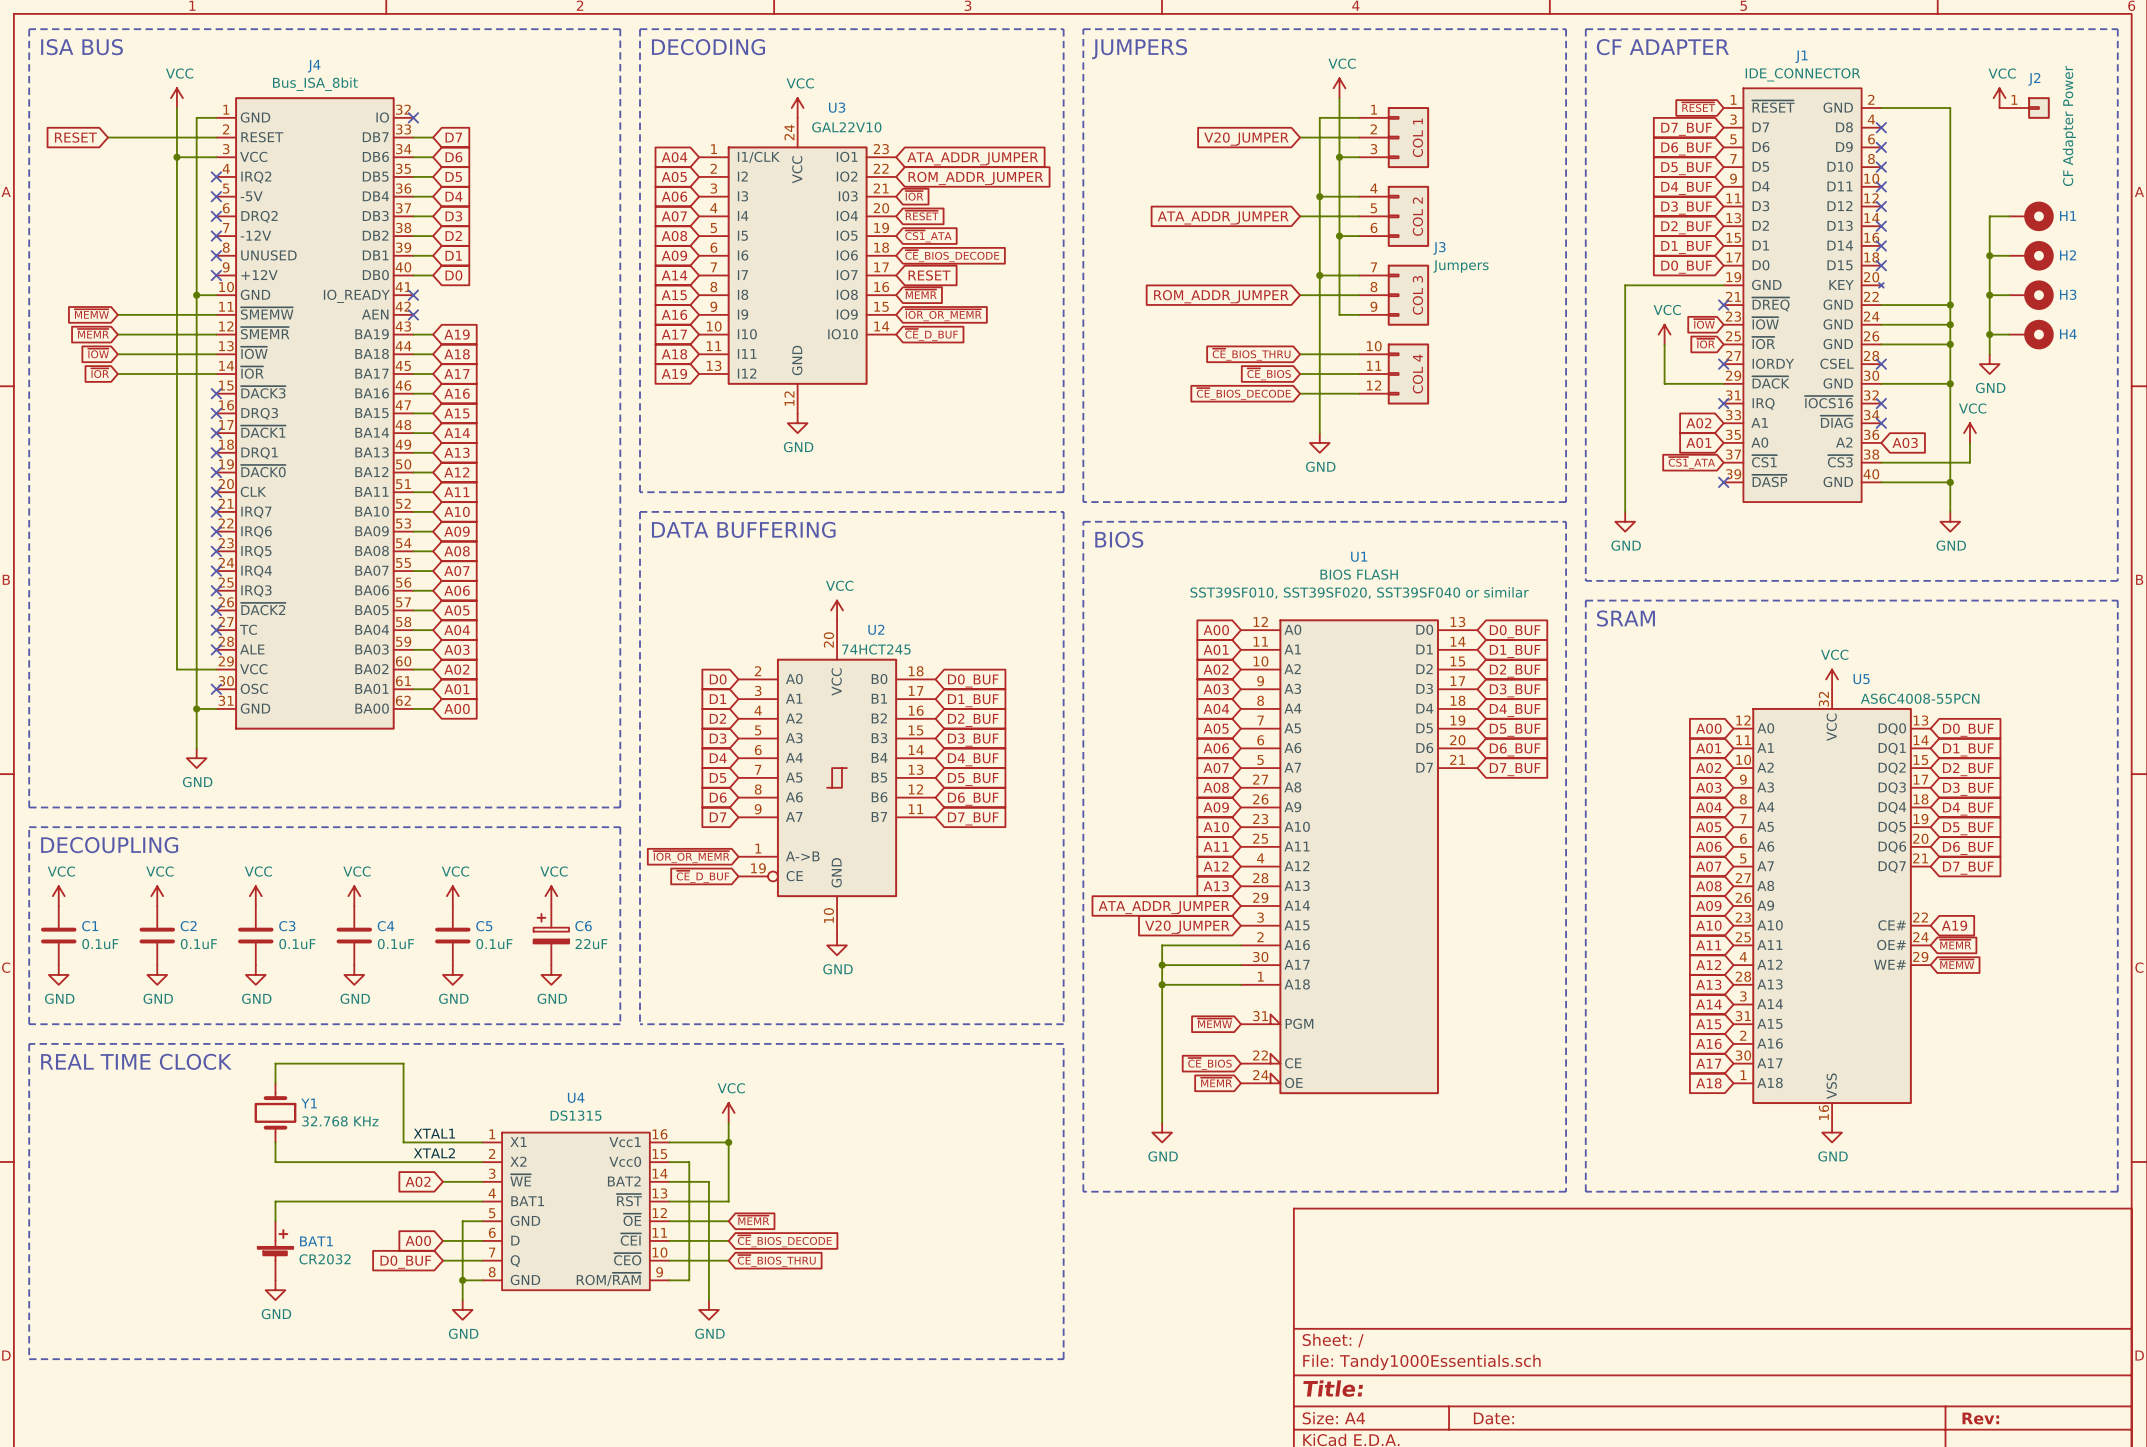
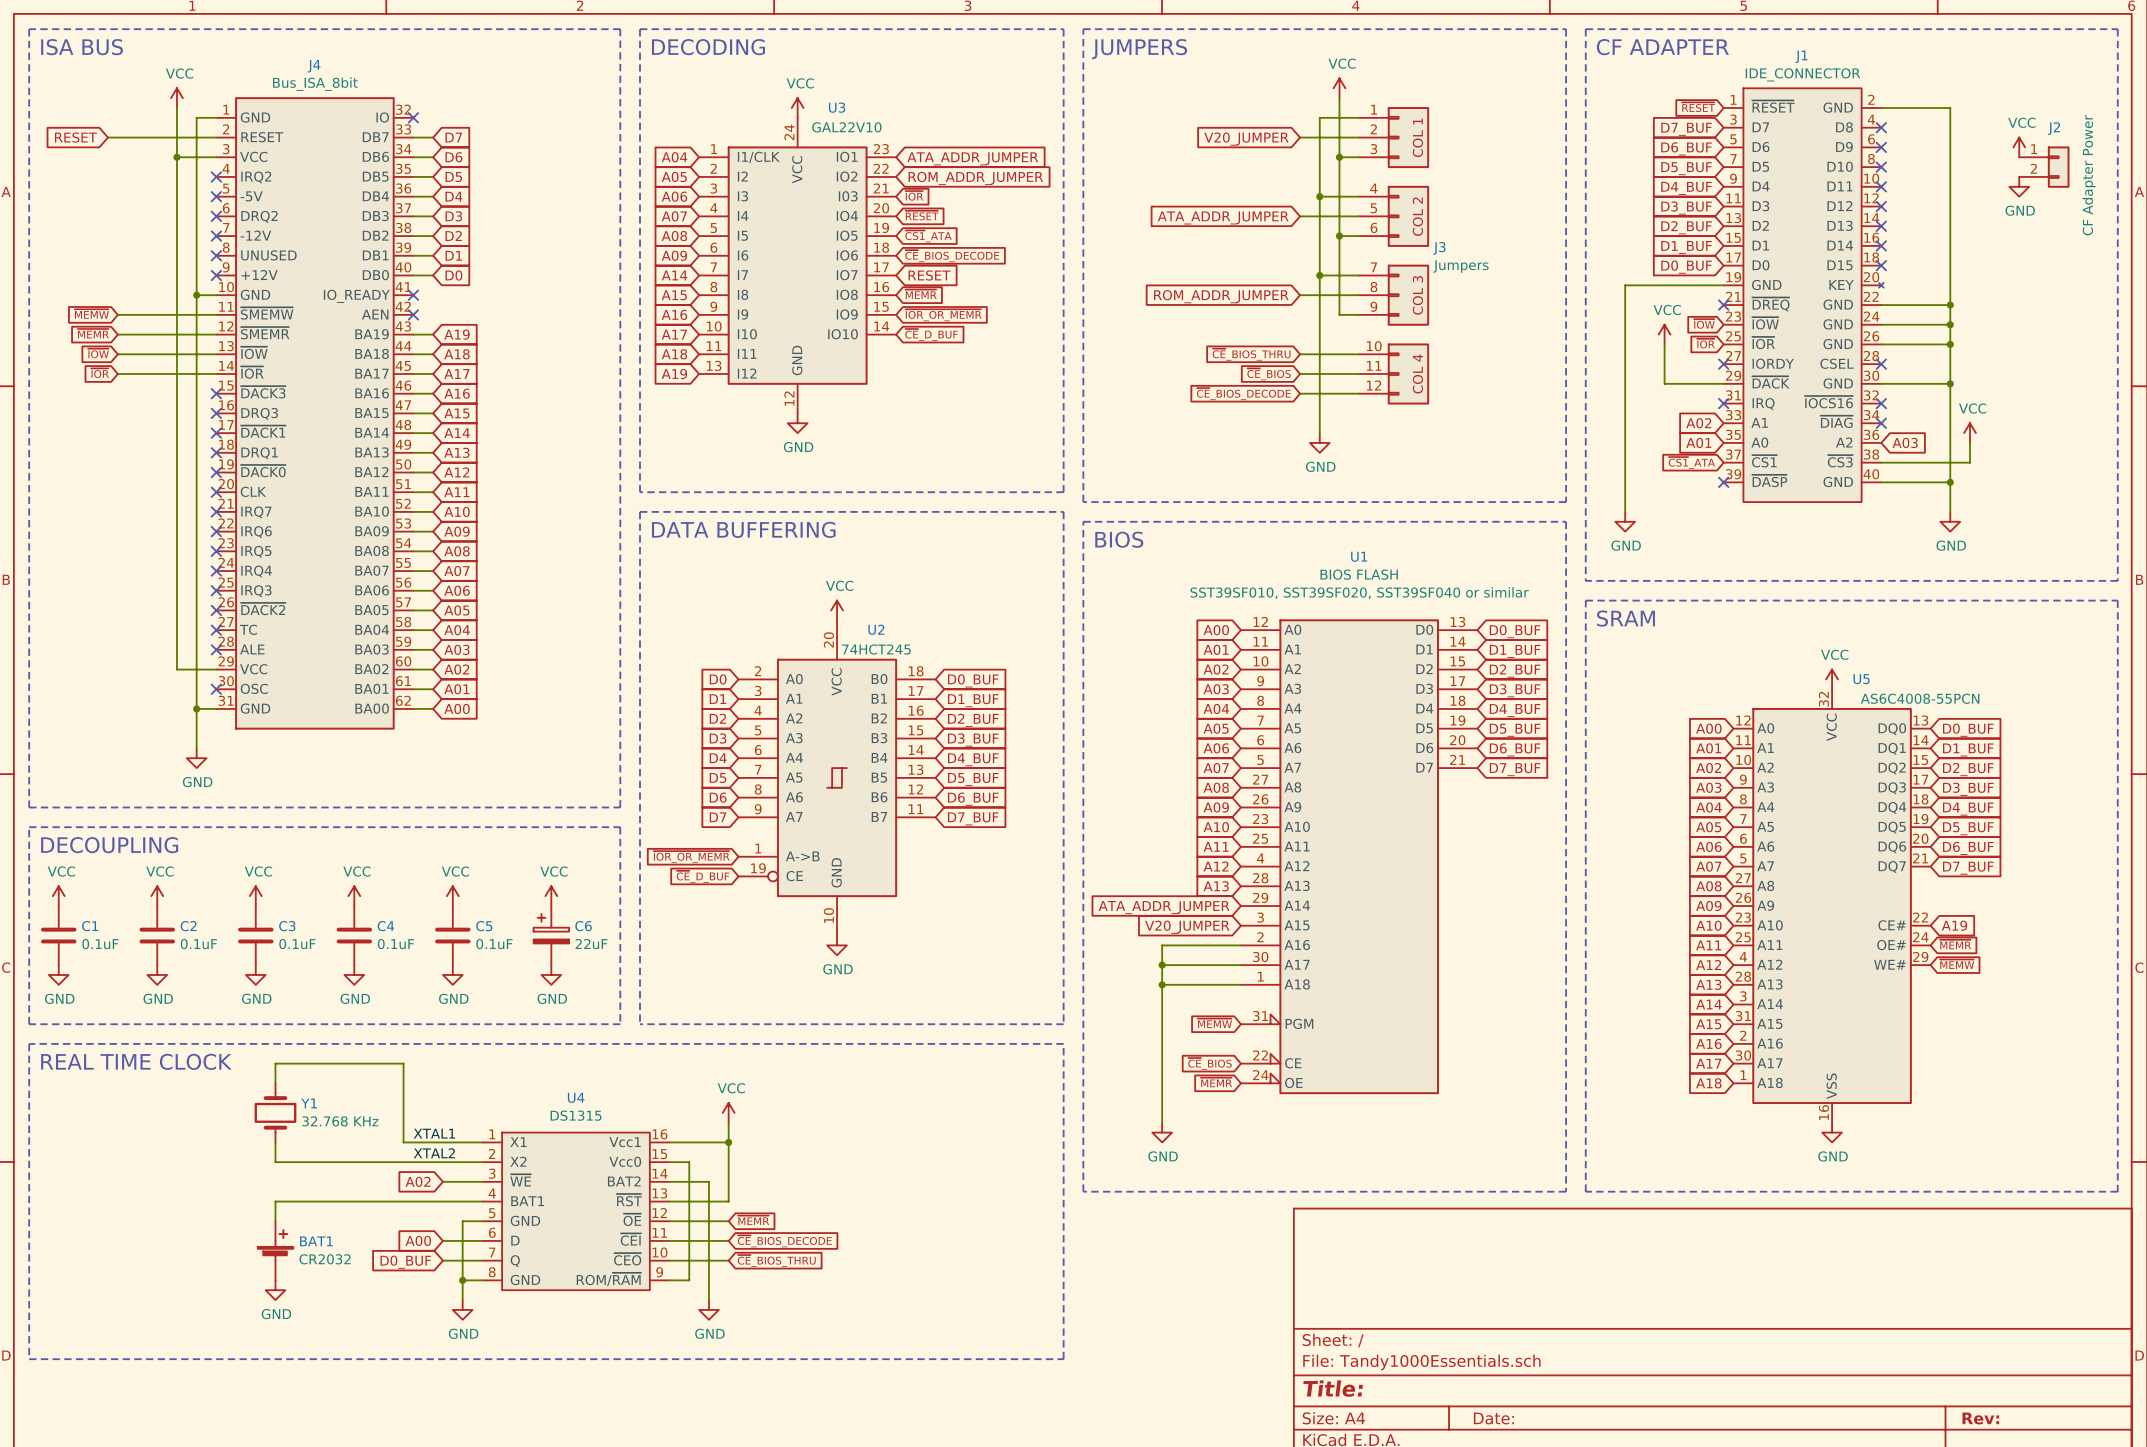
J2 symbol: [1999, 97, 2050, 119] -> [2019, 146, 2070, 188]
power symbol position: VCC (1999, 98) -> VCC (2019, 147)
wire: (2009, 216) (1989, 216) (1989, 354) -> none
H1: (2031, 216) -> none
wire: (1989, 255) (2009, 255) -> none
junction: (1989, 255) -> none
H2: (2031, 255) -> none
wire: (1989, 295) (2009, 295) -> none
junction: (1989, 295) -> none
H3: (2031, 295) -> none
wire: (1989, 334) (2009, 334) -> none
junction: (1989, 334) -> none
H4: (2031, 334) -> none
power symbol position: GND (1989, 364) -> GND (2019, 186)

